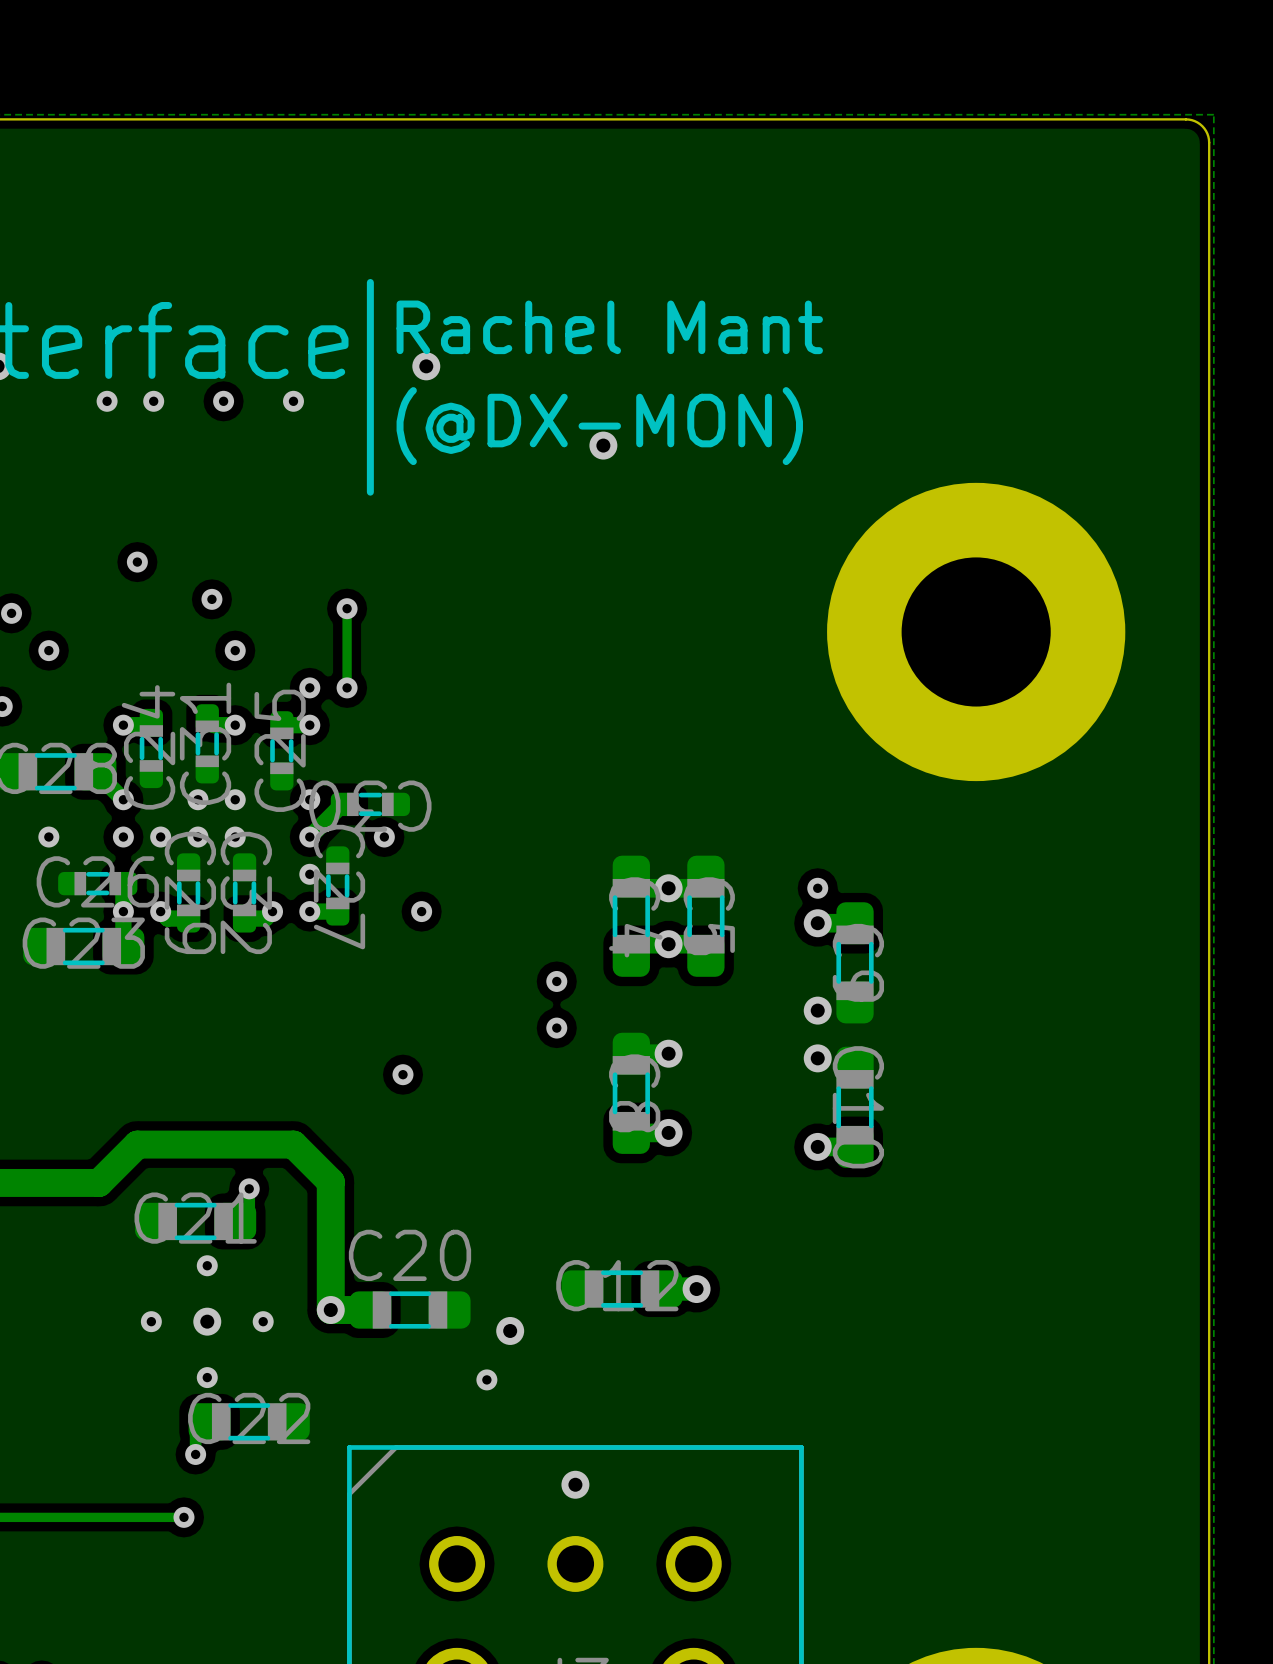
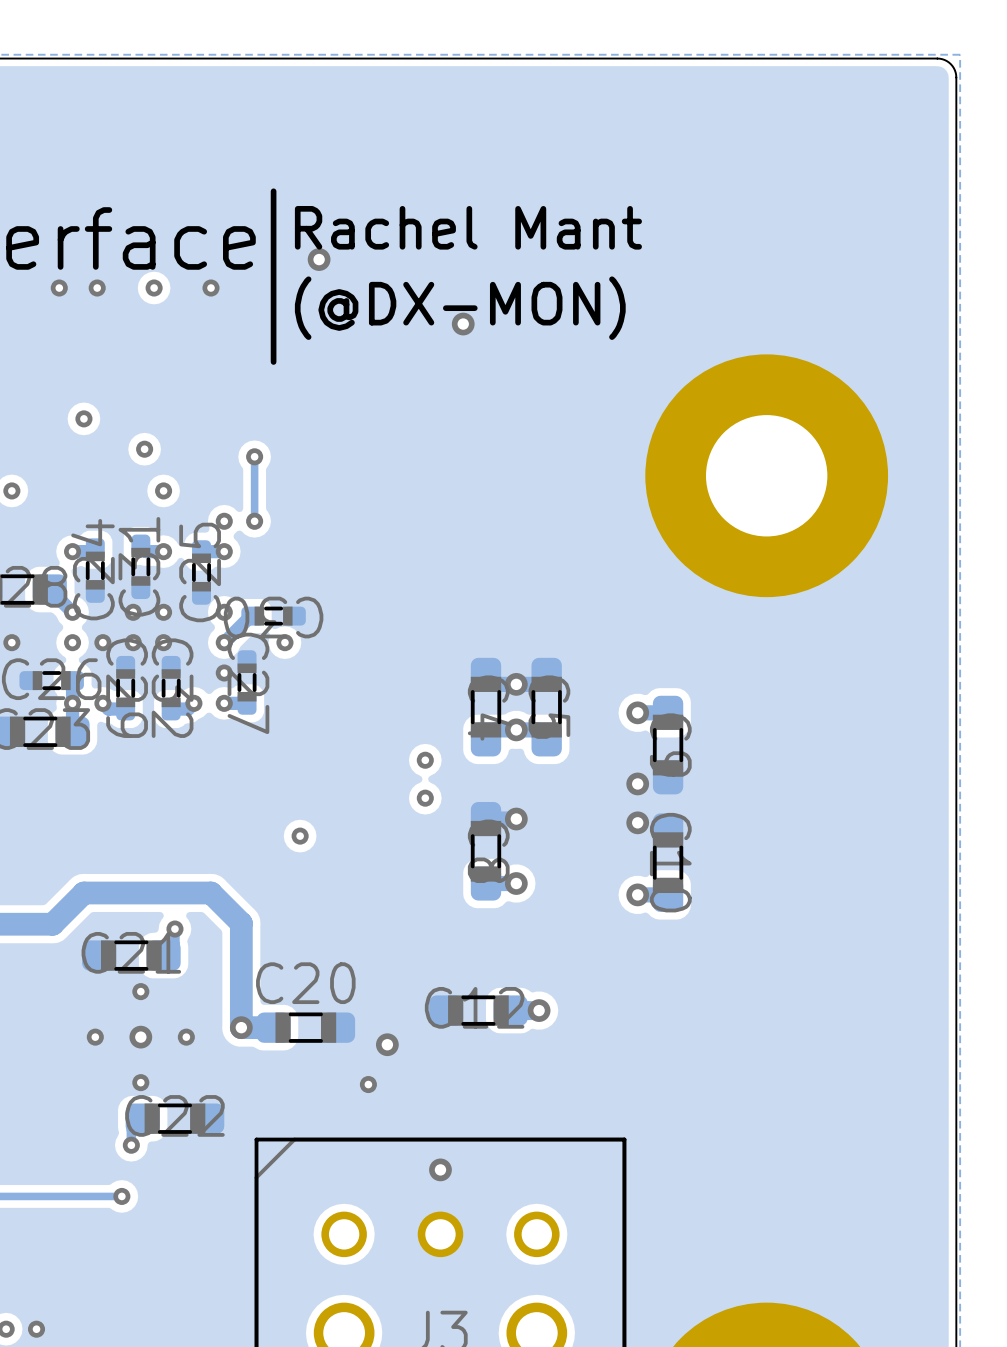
via: (817, 888) -> none
via: (421, 911) -> none

